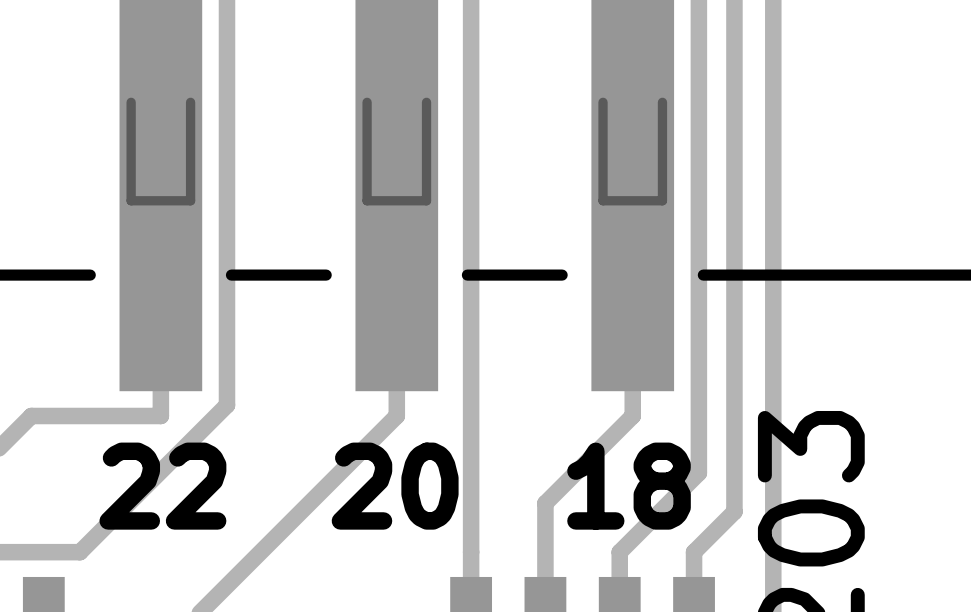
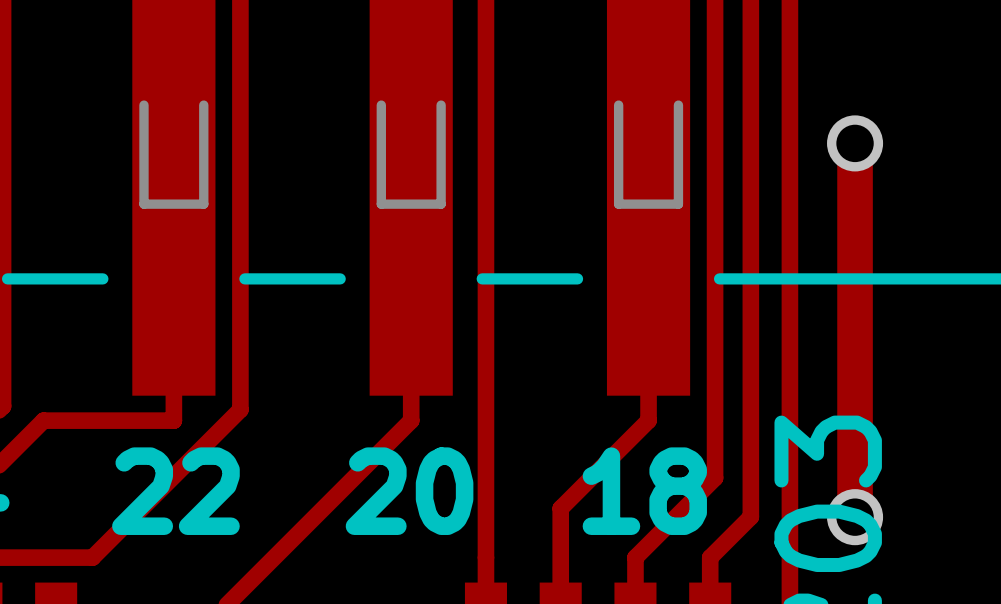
track: none -> (855, 143) (855, 517)
via: none -> (855, 143)
via: none -> (855, 517)

